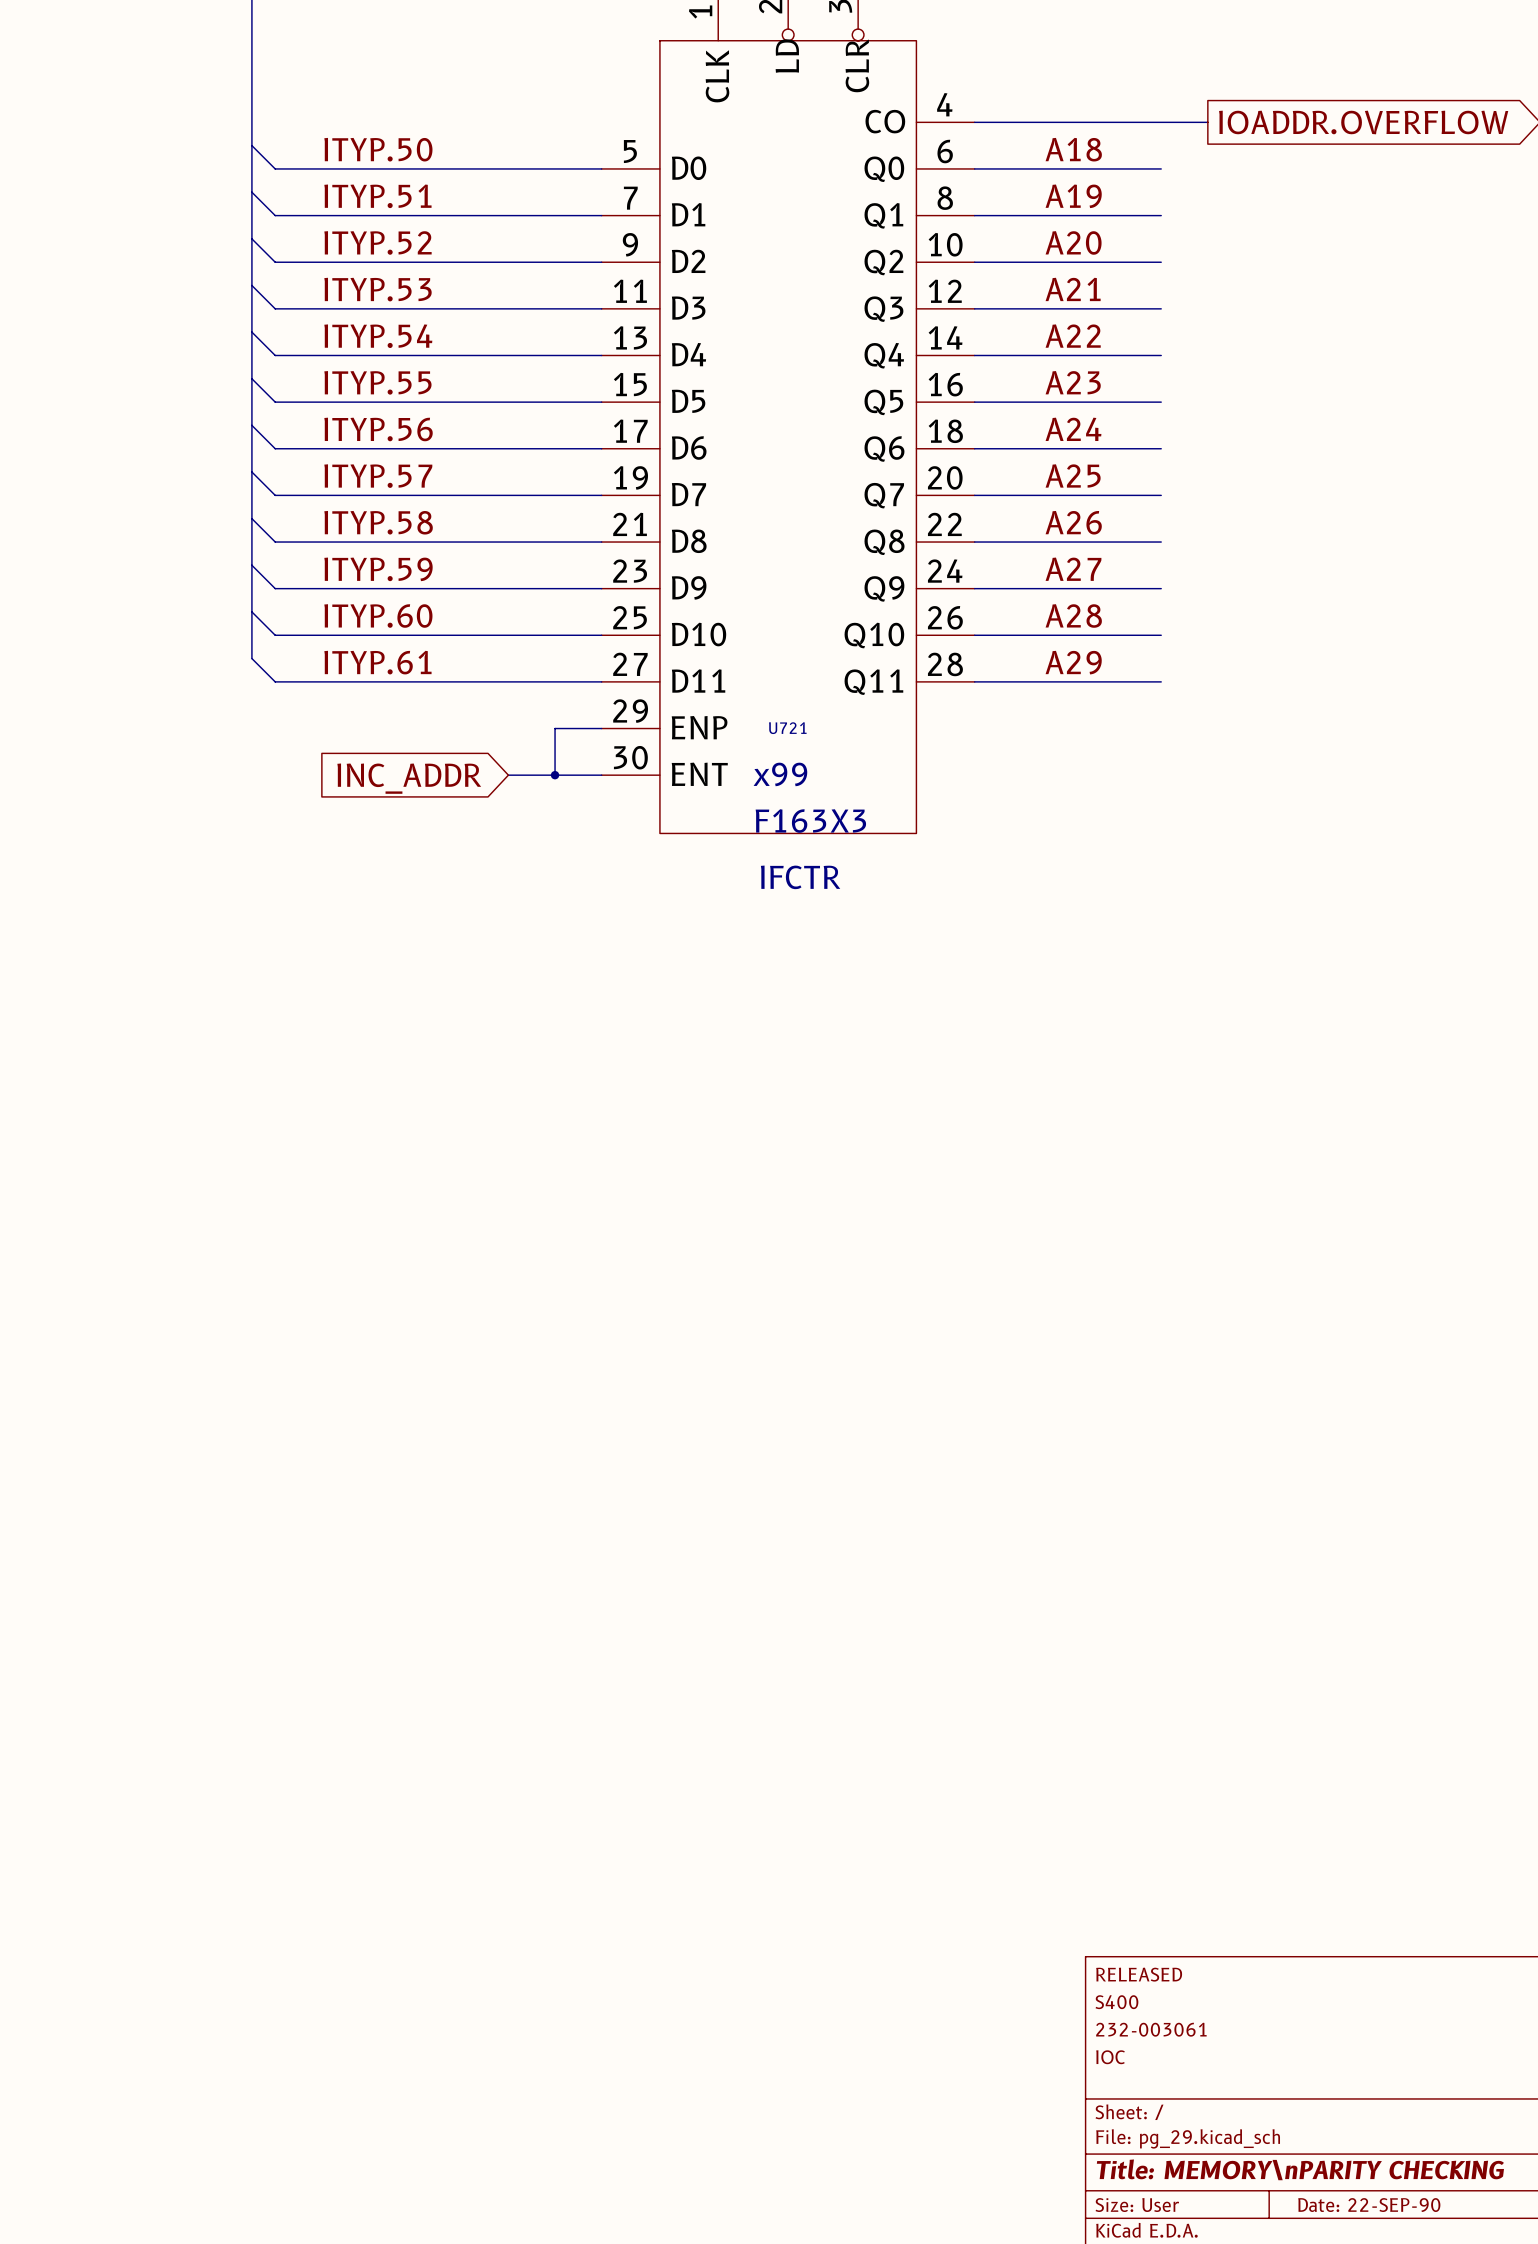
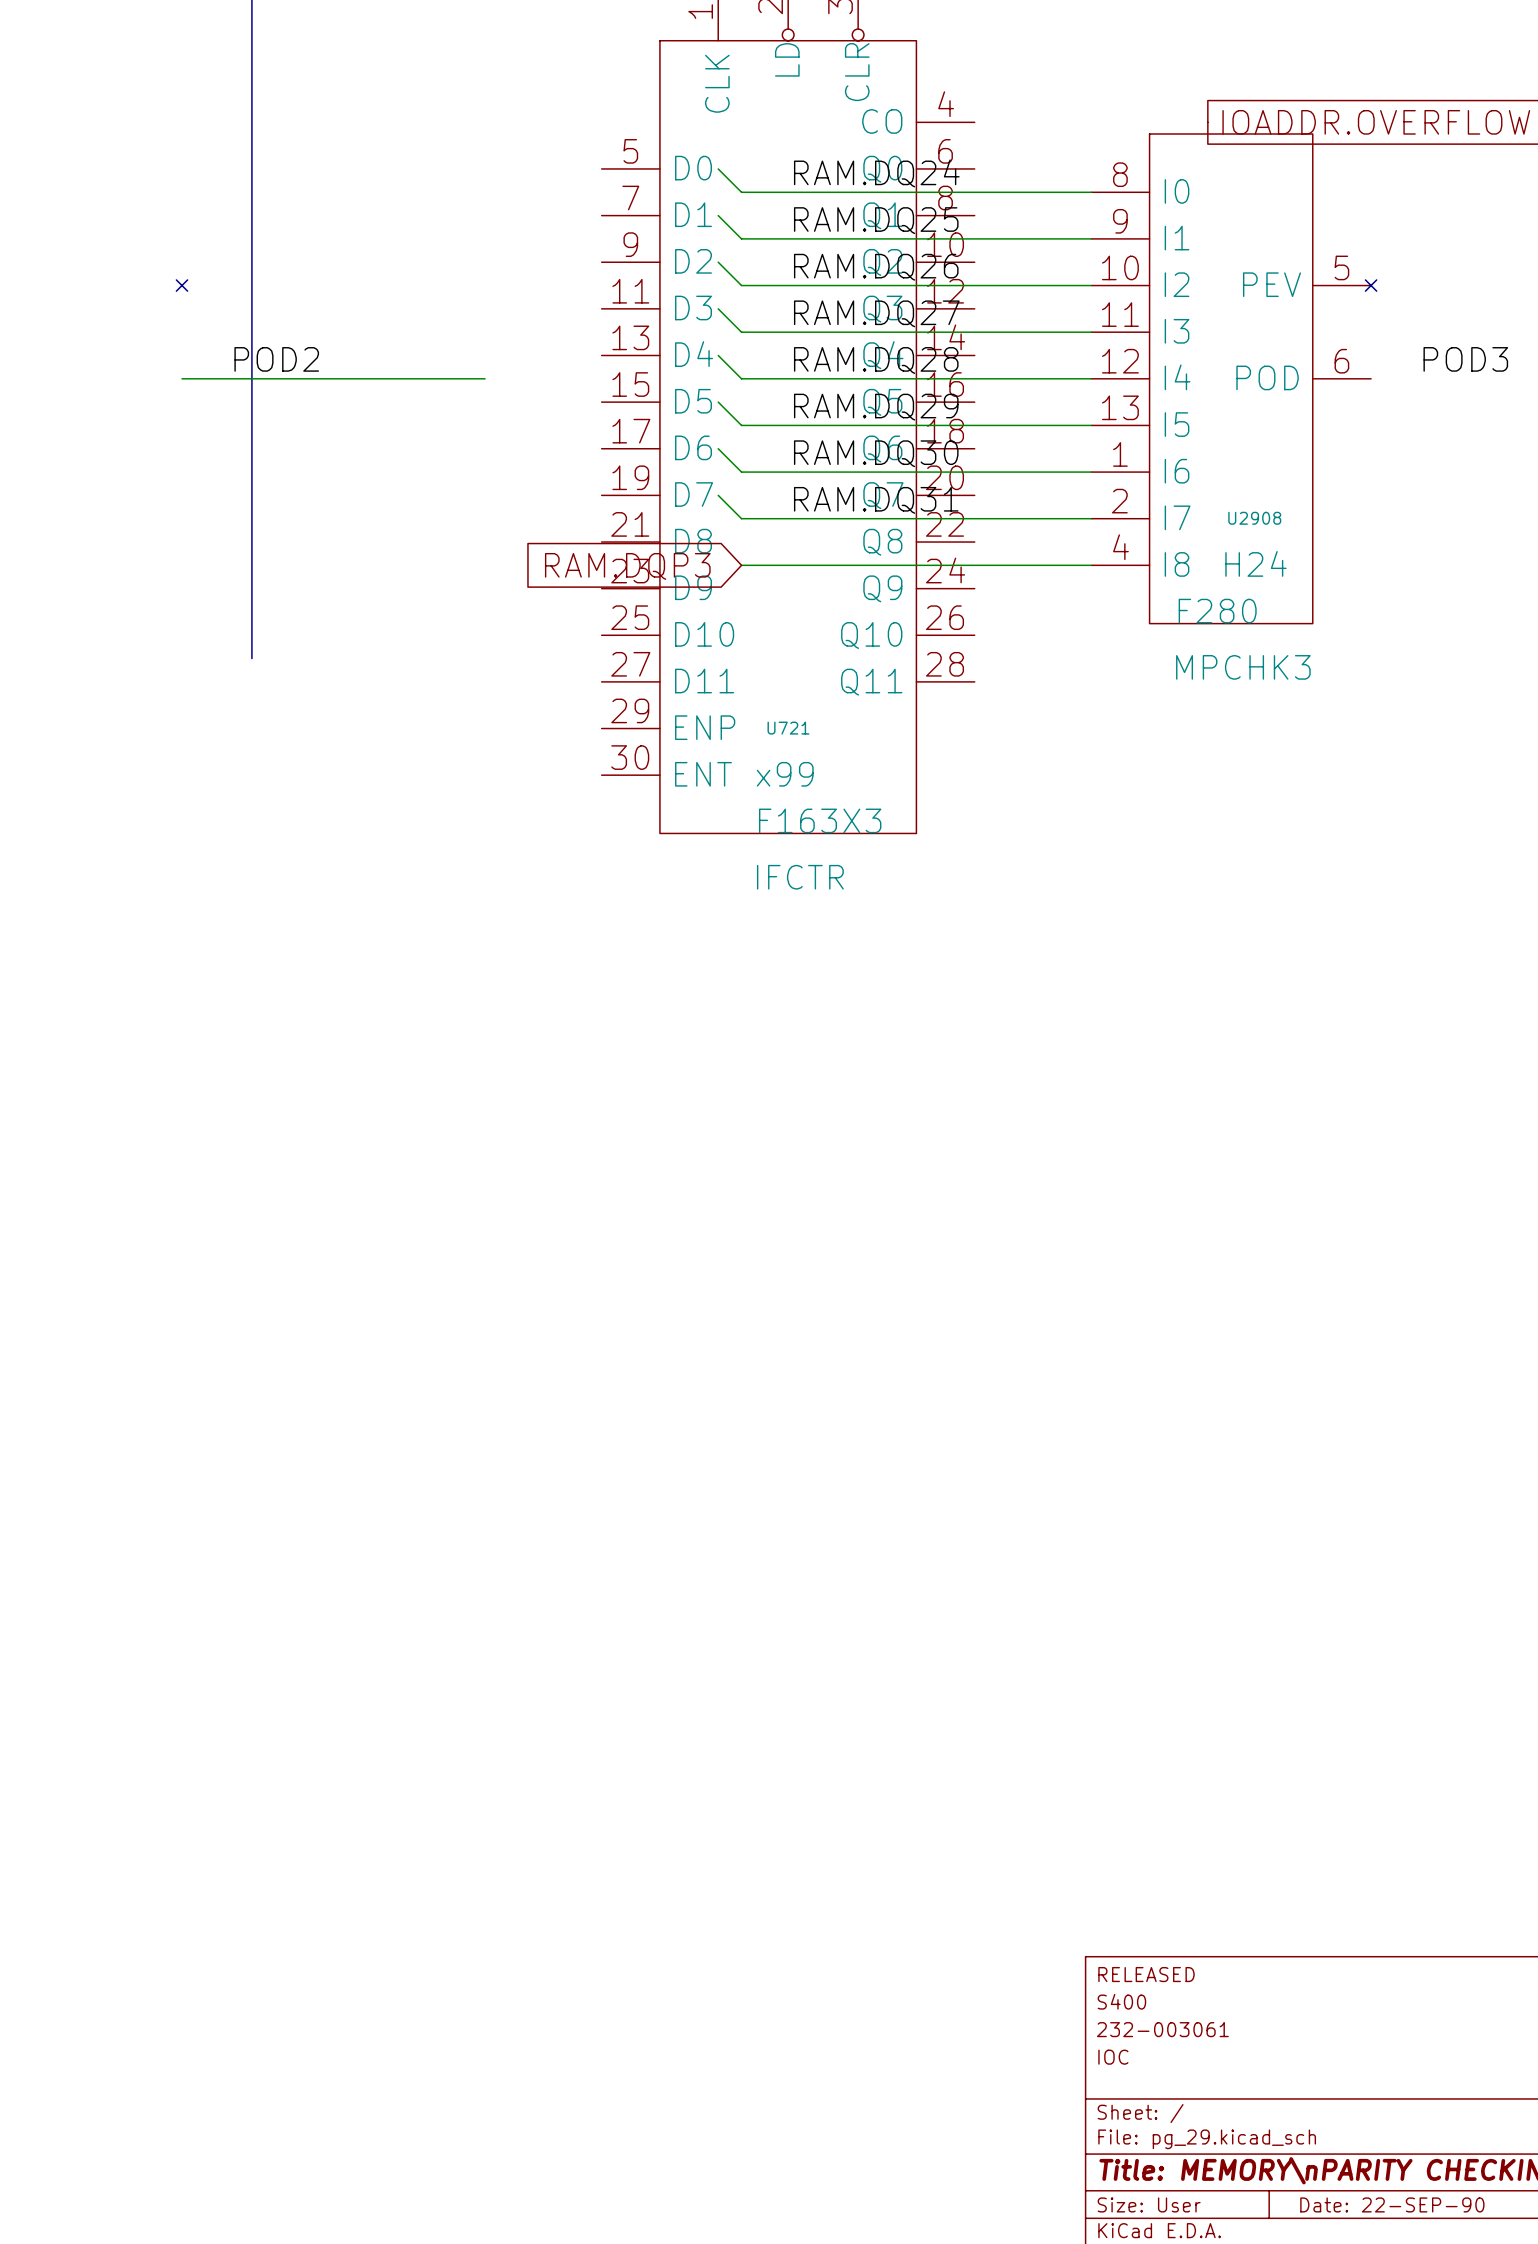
wire: (974, 122) (1207, 122) -> none
wire: (251, 145) (275, 168) (601, 168) -> none
label: ITYP.50 (378, 149) -> none
label: A18 (1073, 149) -> none
wire: none -> (718, 168) (741, 192) (1091, 192)
wire: (974, 168) (1161, 168) -> none
label: none -> RAM.DQ24 (876, 173)
wire: (251, 192) (275, 215) (601, 215) -> none
label: ITYP.51 (377, 196) -> none
label: A19 (1073, 196) -> none
wire: none -> (718, 215) (741, 238) (1091, 238)
wire: (974, 215) (1161, 215) -> none
label: none -> RAM.DQ25 (876, 220)
wire: (251, 238) (275, 262) (601, 262) -> none
label: ITYP.52 (377, 242) -> none
label: A20 (1073, 242) -> none
wire: none -> (718, 262) (741, 285) (1091, 285)
wire: (974, 262) (1161, 262) -> none
label: none -> RAM.DQ26 (876, 267)
no-connect mark: none -> (181, 285)
wire: (251, 285) (275, 308) (601, 308) -> none
no-connect mark: none -> (1371, 285)
label: ITYP.53 (378, 289) -> none
label: A21 (1073, 289) -> none
wire: none -> (718, 308) (741, 332) (1091, 332)
wire: (974, 308) (1161, 308) -> none
label: none -> RAM.DQ27 (876, 313)
wire: (251, 332) (275, 355) (601, 355) -> none
label: ITYP.54 (378, 336) -> none
label: A22 (1073, 336) -> none
wire: none -> (718, 355) (741, 378) (1091, 378)
wire: (974, 355) (1161, 355) -> none
label: none -> POD2 (276, 359)
label: none -> POD3 (1465, 359)
label: none -> RAM.DQ28 (876, 360)
wire: none -> (181, 378) (485, 378)
wire: (251, 378) (275, 402) (601, 402) -> none
U2908: none -> F280 (1231, 378)
label: ITYP.55 (377, 382) -> none
label: A23 (1073, 382) -> none
wire: none -> (718, 402) (741, 425) (1091, 425)
wire: (974, 402) (1161, 402) -> none
label: none -> RAM.DQ29 (876, 407)
wire: (251, 425) (275, 448) (601, 448) -> none
label: ITYP.56 (378, 429) -> none
label: A24 (1073, 429) -> none
wire: none -> (718, 448) (741, 472) (1091, 472)
wire: (974, 448) (1161, 448) -> none
label: none -> RAM.DQ30 (876, 453)
wire: (251, 472) (275, 495) (601, 495) -> none
label: A25 (1073, 475) -> none
label: ITYP.57 (378, 476) -> none
wire: none -> (718, 495) (741, 518) (1091, 518)
wire: (974, 495) (1161, 495) -> none
label: none -> RAM.DQ31 (876, 500)
wire: (251, 518) (275, 542) (601, 542) -> none
label: ITYP.58 (378, 522) -> none
label: A26 (1073, 522) -> none
wire: (974, 542) (1161, 542) -> none
wire: (251, 565) (275, 588) (601, 588) -> none
wire: none -> (741, 565) (1091, 565)
global label: none -> RAM.DQP3 (627, 566)
label: ITYP.59 (378, 569) -> none
label: A27 (1073, 569) -> none
wire: (974, 588) (1161, 588) -> none
wire: (251, 611) (275, 635) (601, 635) -> none
label: ITYP.60 (378, 615) -> none
label: A28 (1073, 615) -> none
wire: (974, 635) (1161, 635) -> none
wire: (251, 658) (275, 681) (601, 681) -> none
label: ITYP.61 (377, 662) -> none
label: A29 (1073, 662) -> none
wire: (974, 681) (1161, 681) -> none
wire: (601, 728) (555, 728) (555, 775) -> none
wire: (508, 775) (601, 775) -> none
junction: (555, 775) -> none
global label: INC_ADDR (409, 778) -> none

